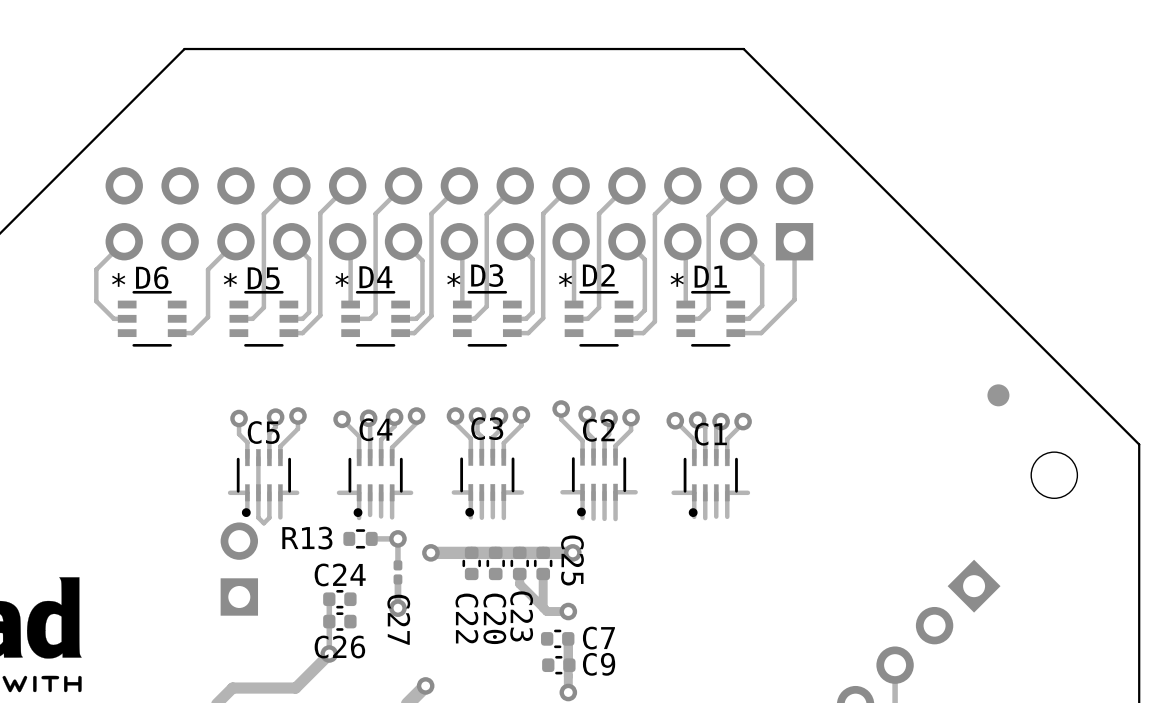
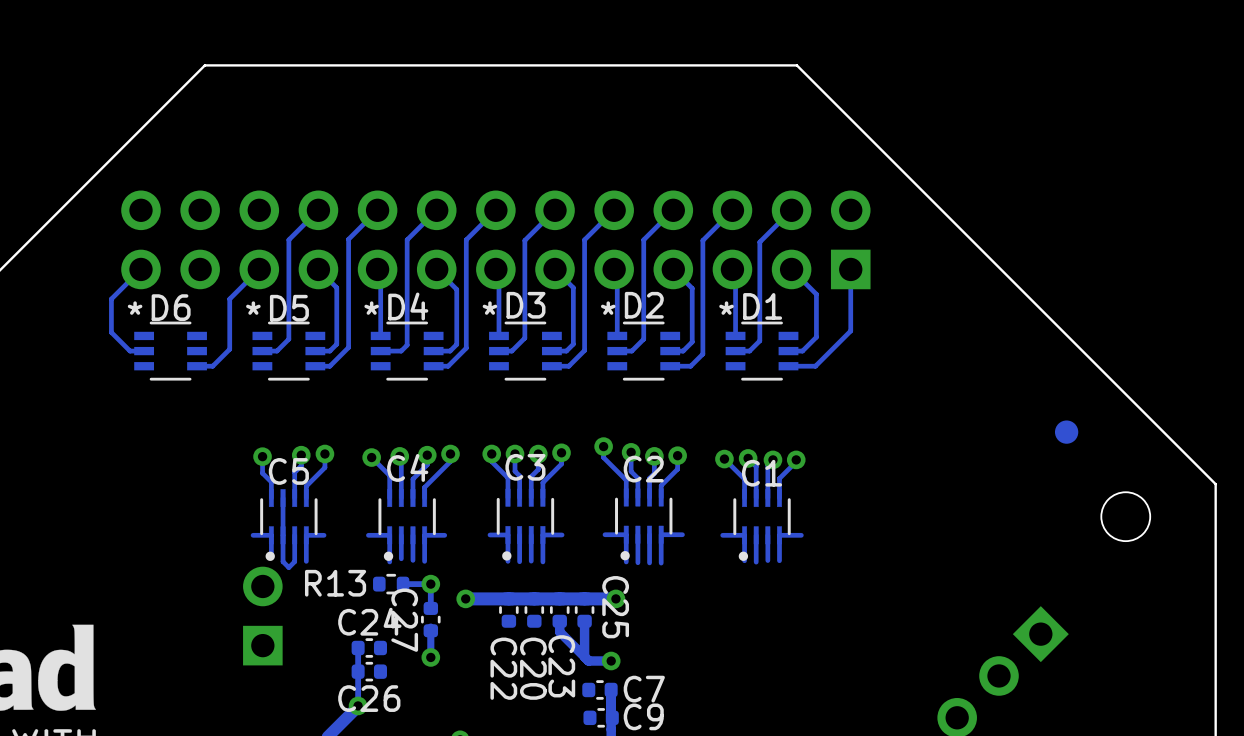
C27 footprint: [393, 560, 403, 585] -> [421, 601, 441, 638]
C27 name position: C27 (398, 619) -> C27 (404, 620)

